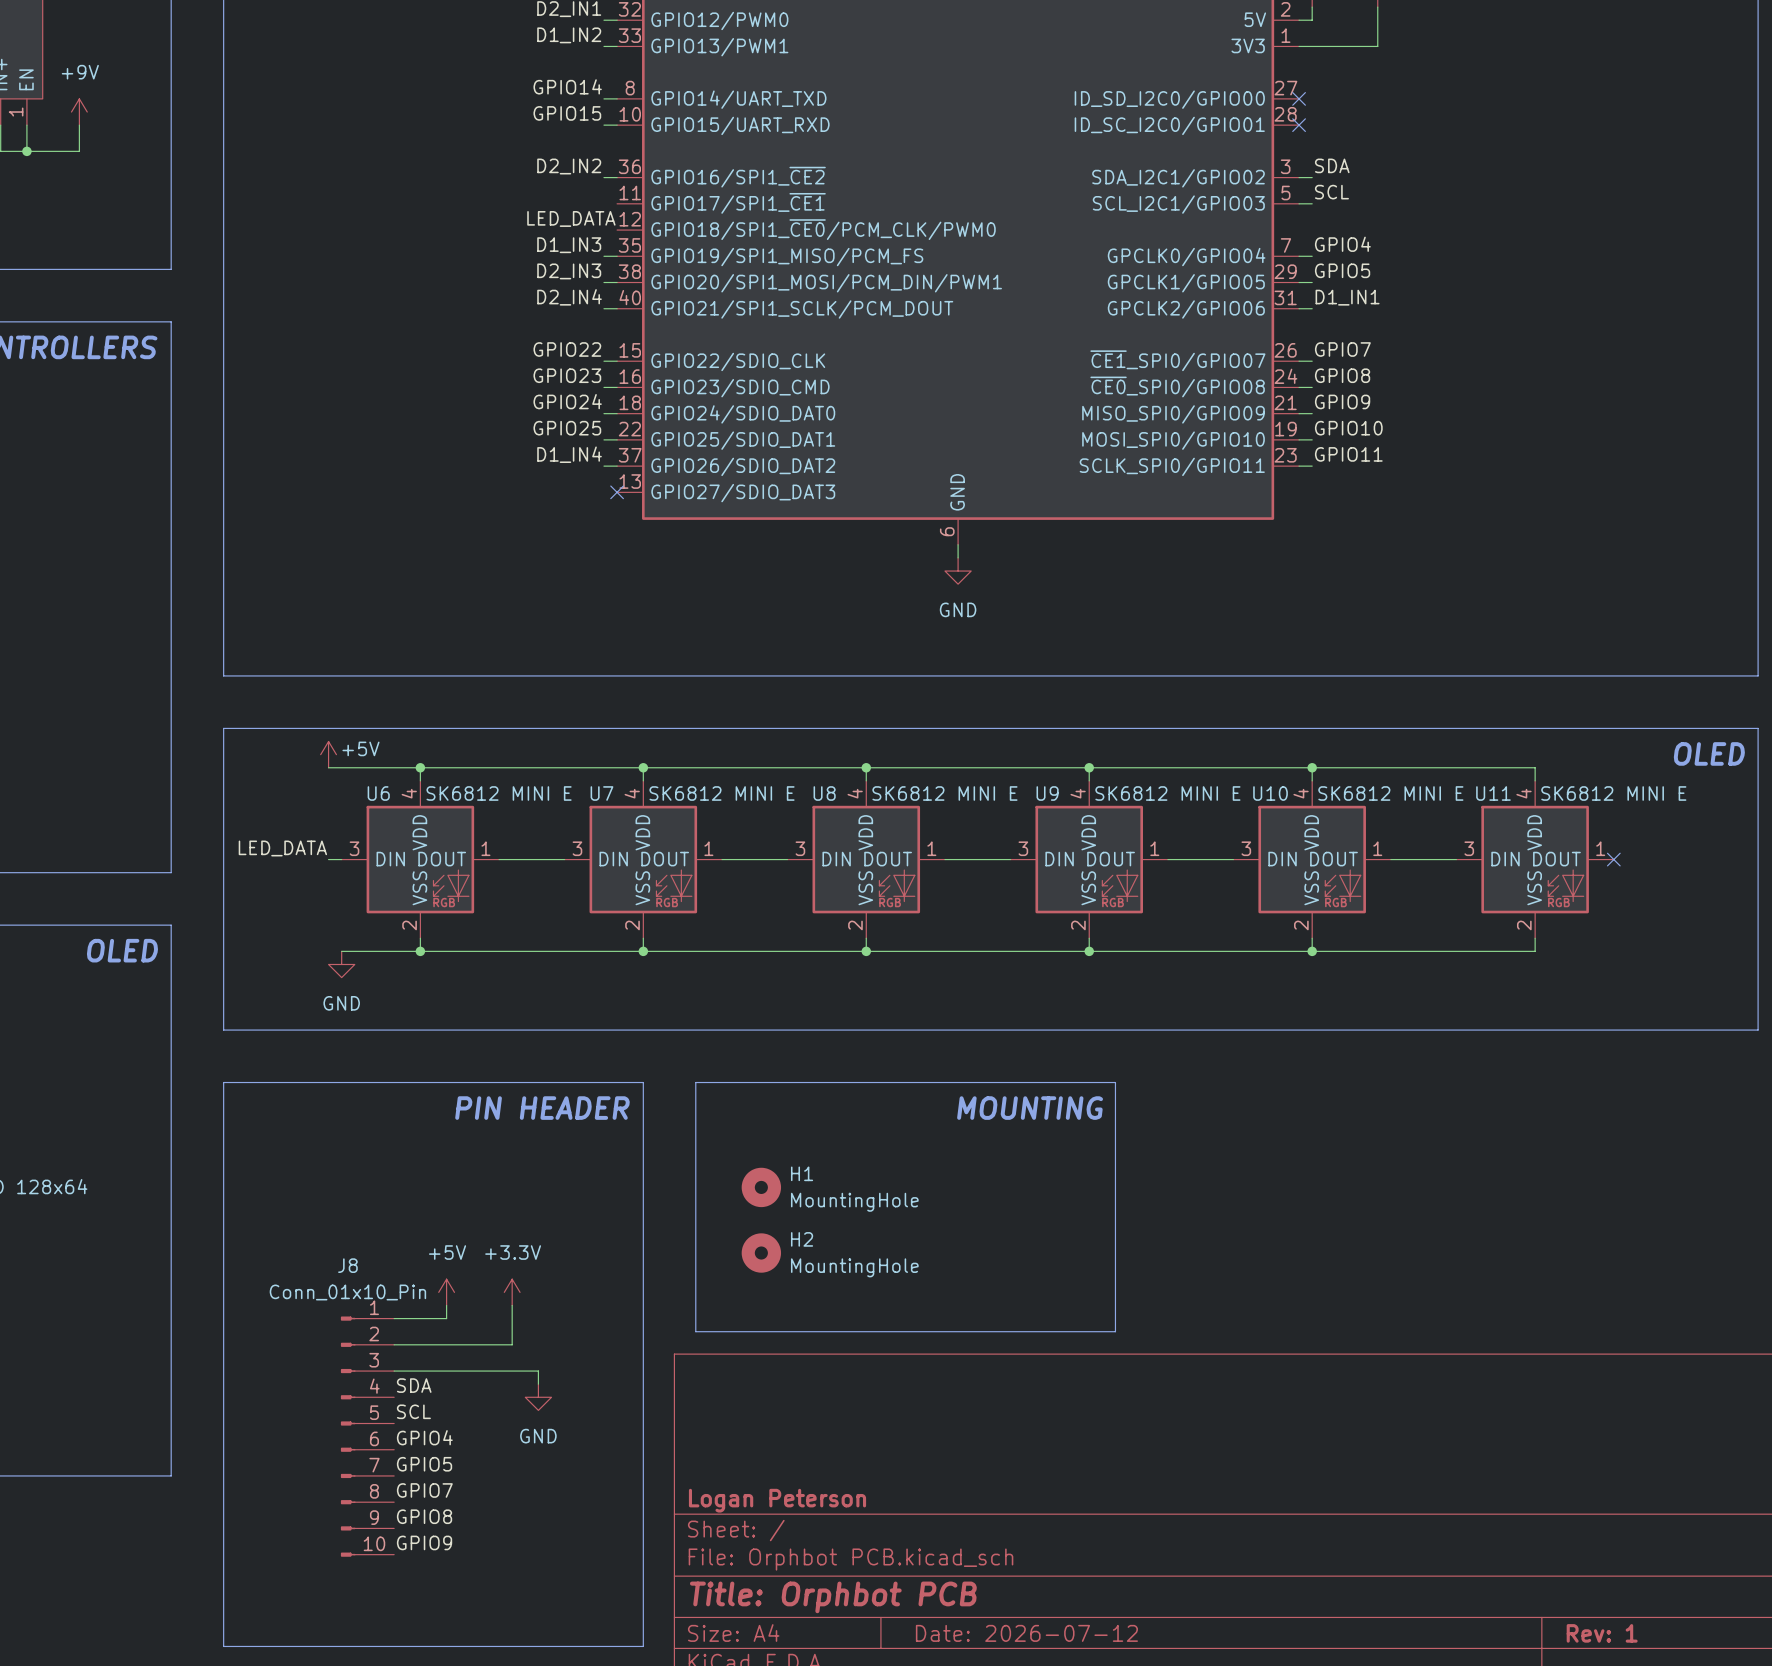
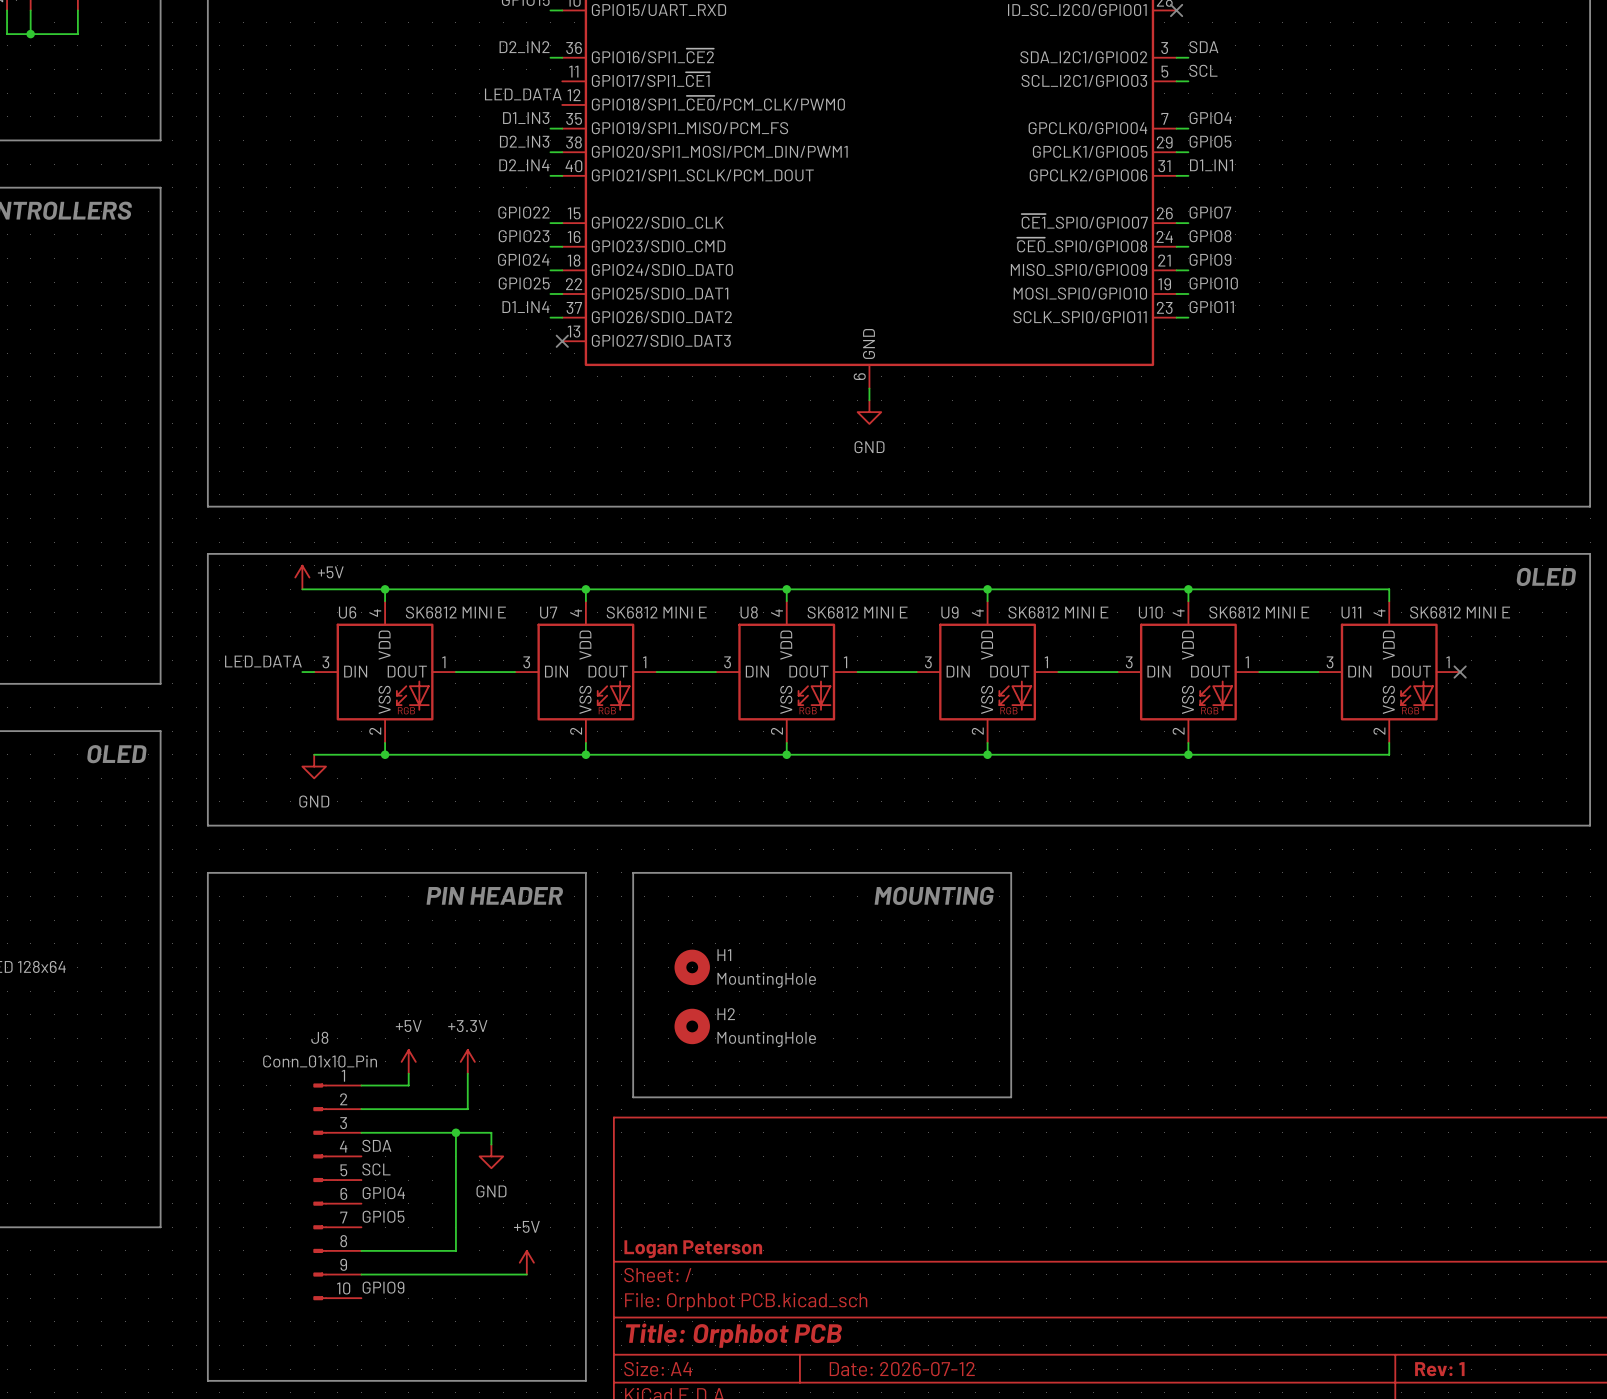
wire: none -> (455, 1132) (455, 1250) (361, 1250)
junction: none -> (455, 1132)
label: GPIO7 (424, 1490) -> none
power symbol: none -> +5V (526, 1262)
label: GPIO8 (424, 1516) -> none
wire: none -> (361, 1274) (526, 1274)

